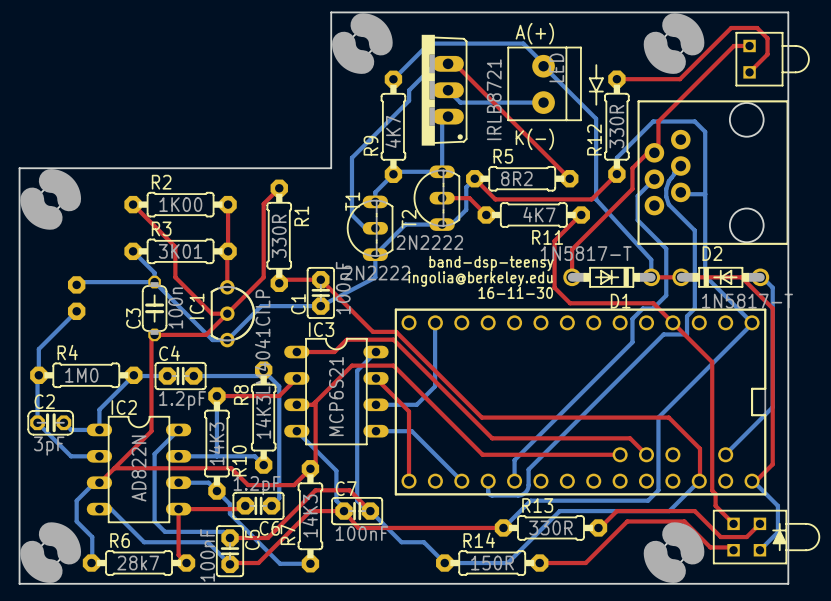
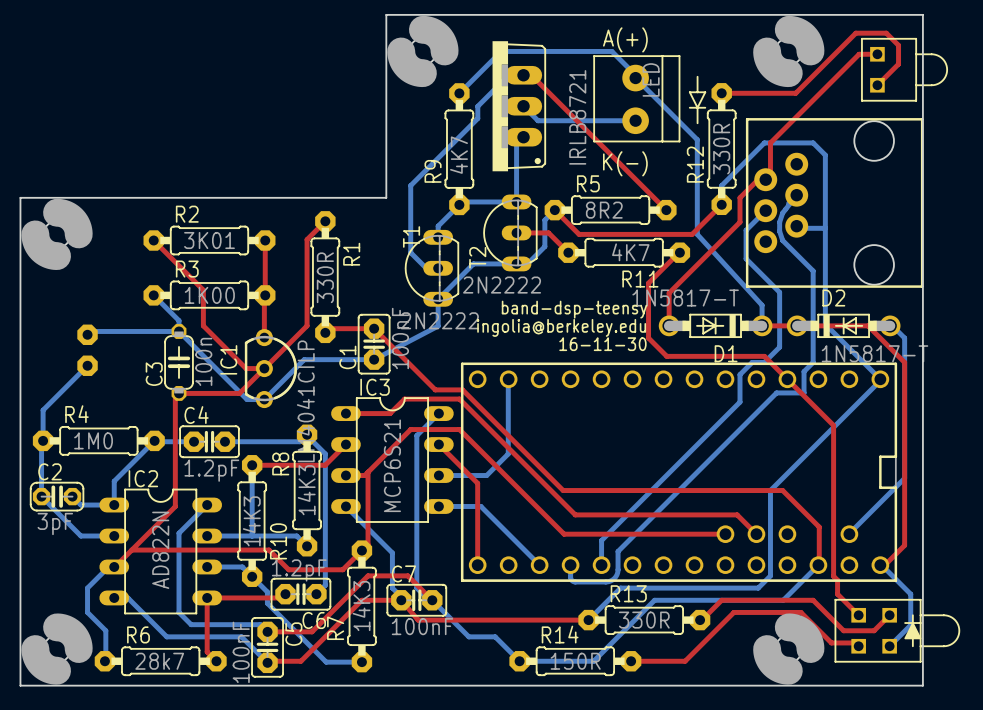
R2 value: 1K00 (180, 204) -> 3K01 (209, 240)
R3 value: 3K01 (180, 251) -> 1K00 (209, 295)

